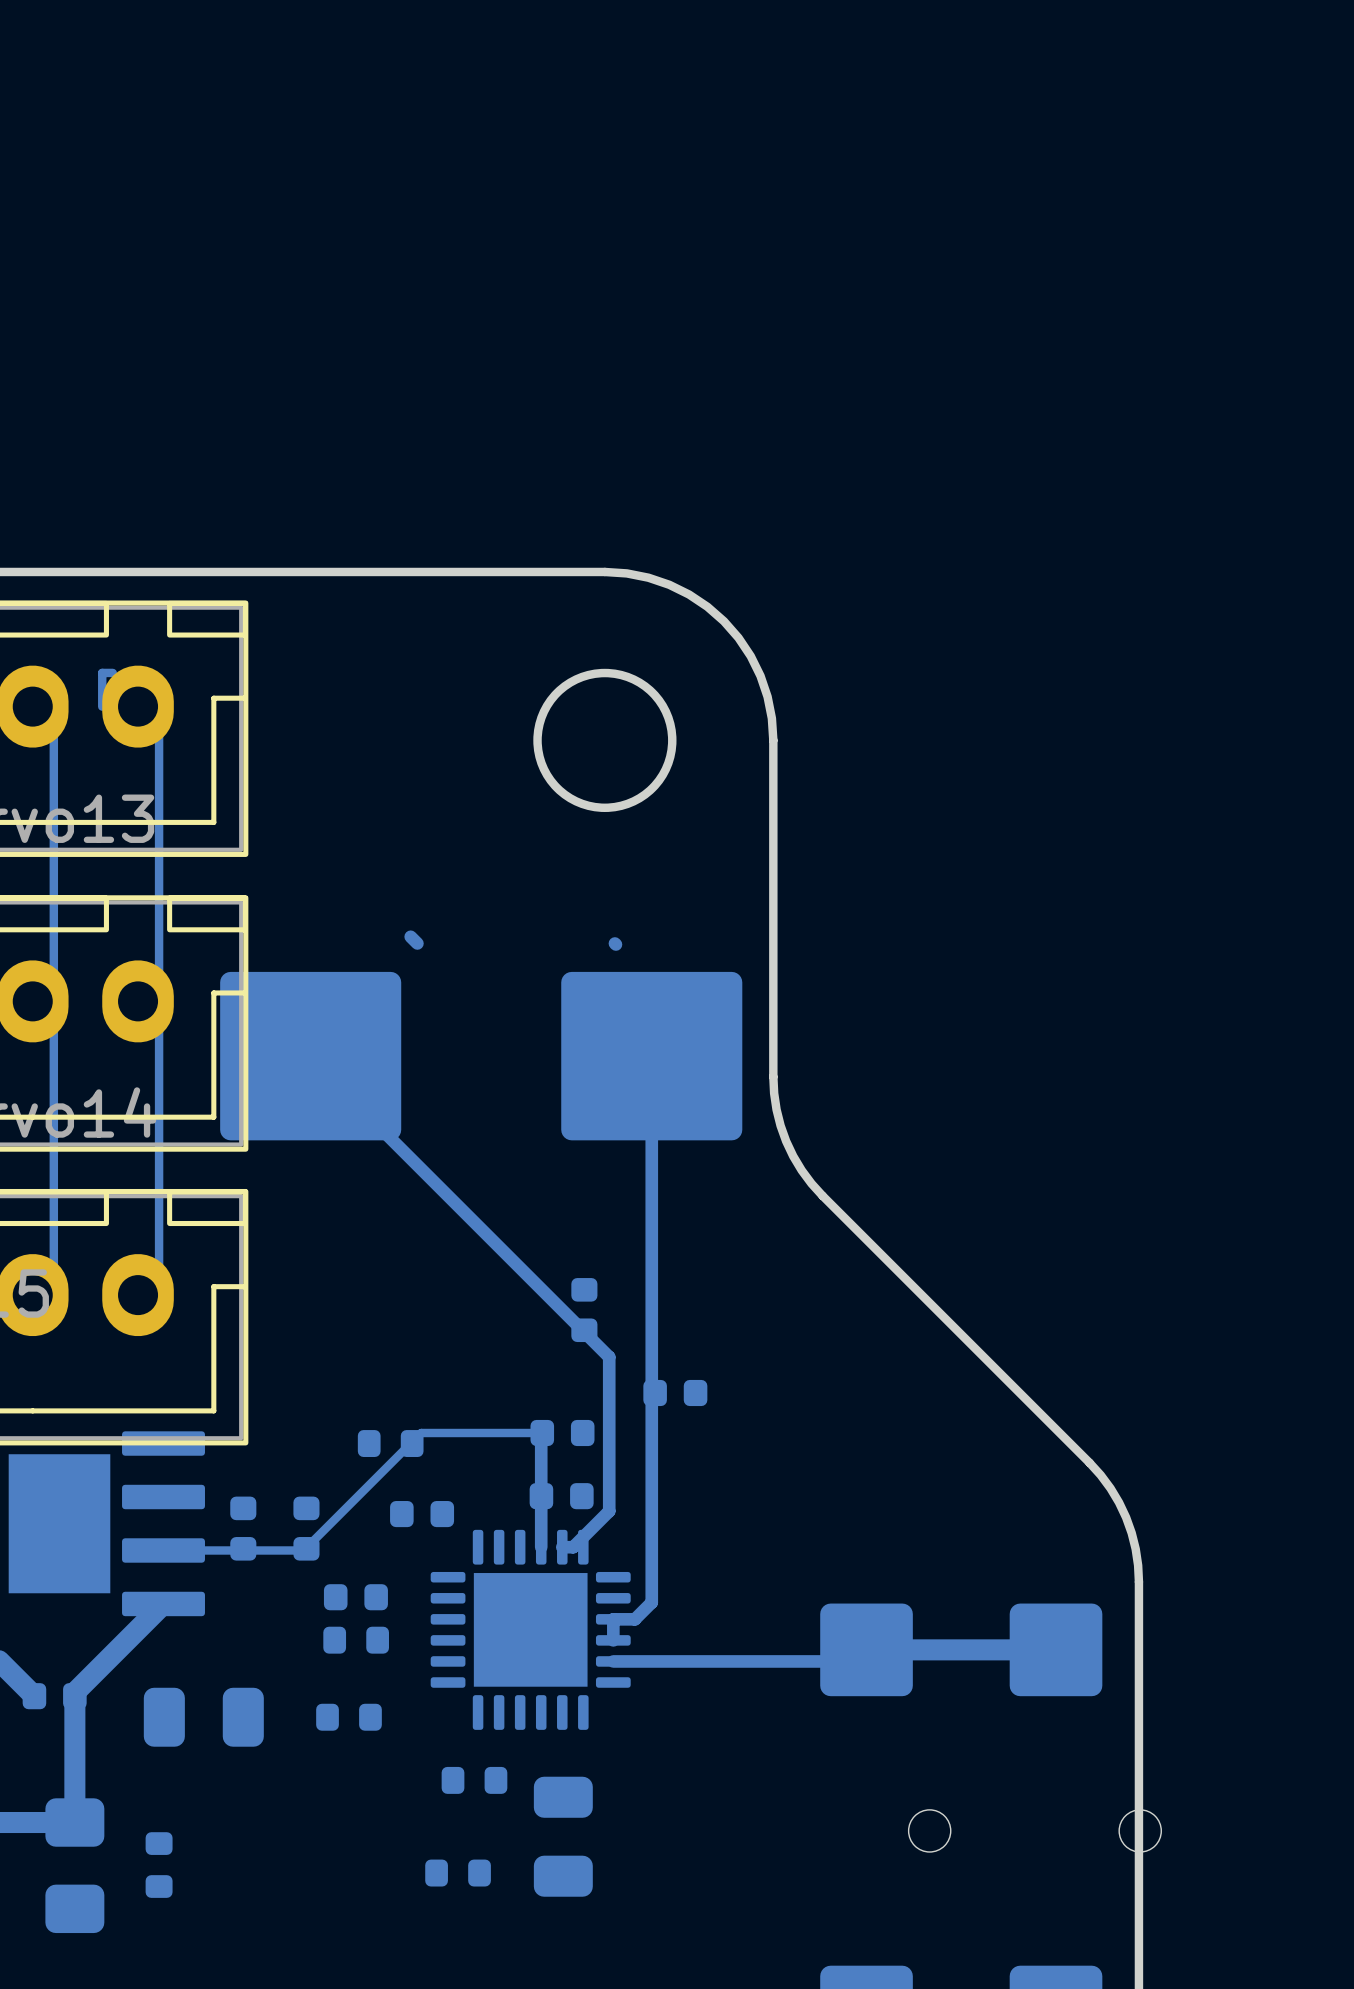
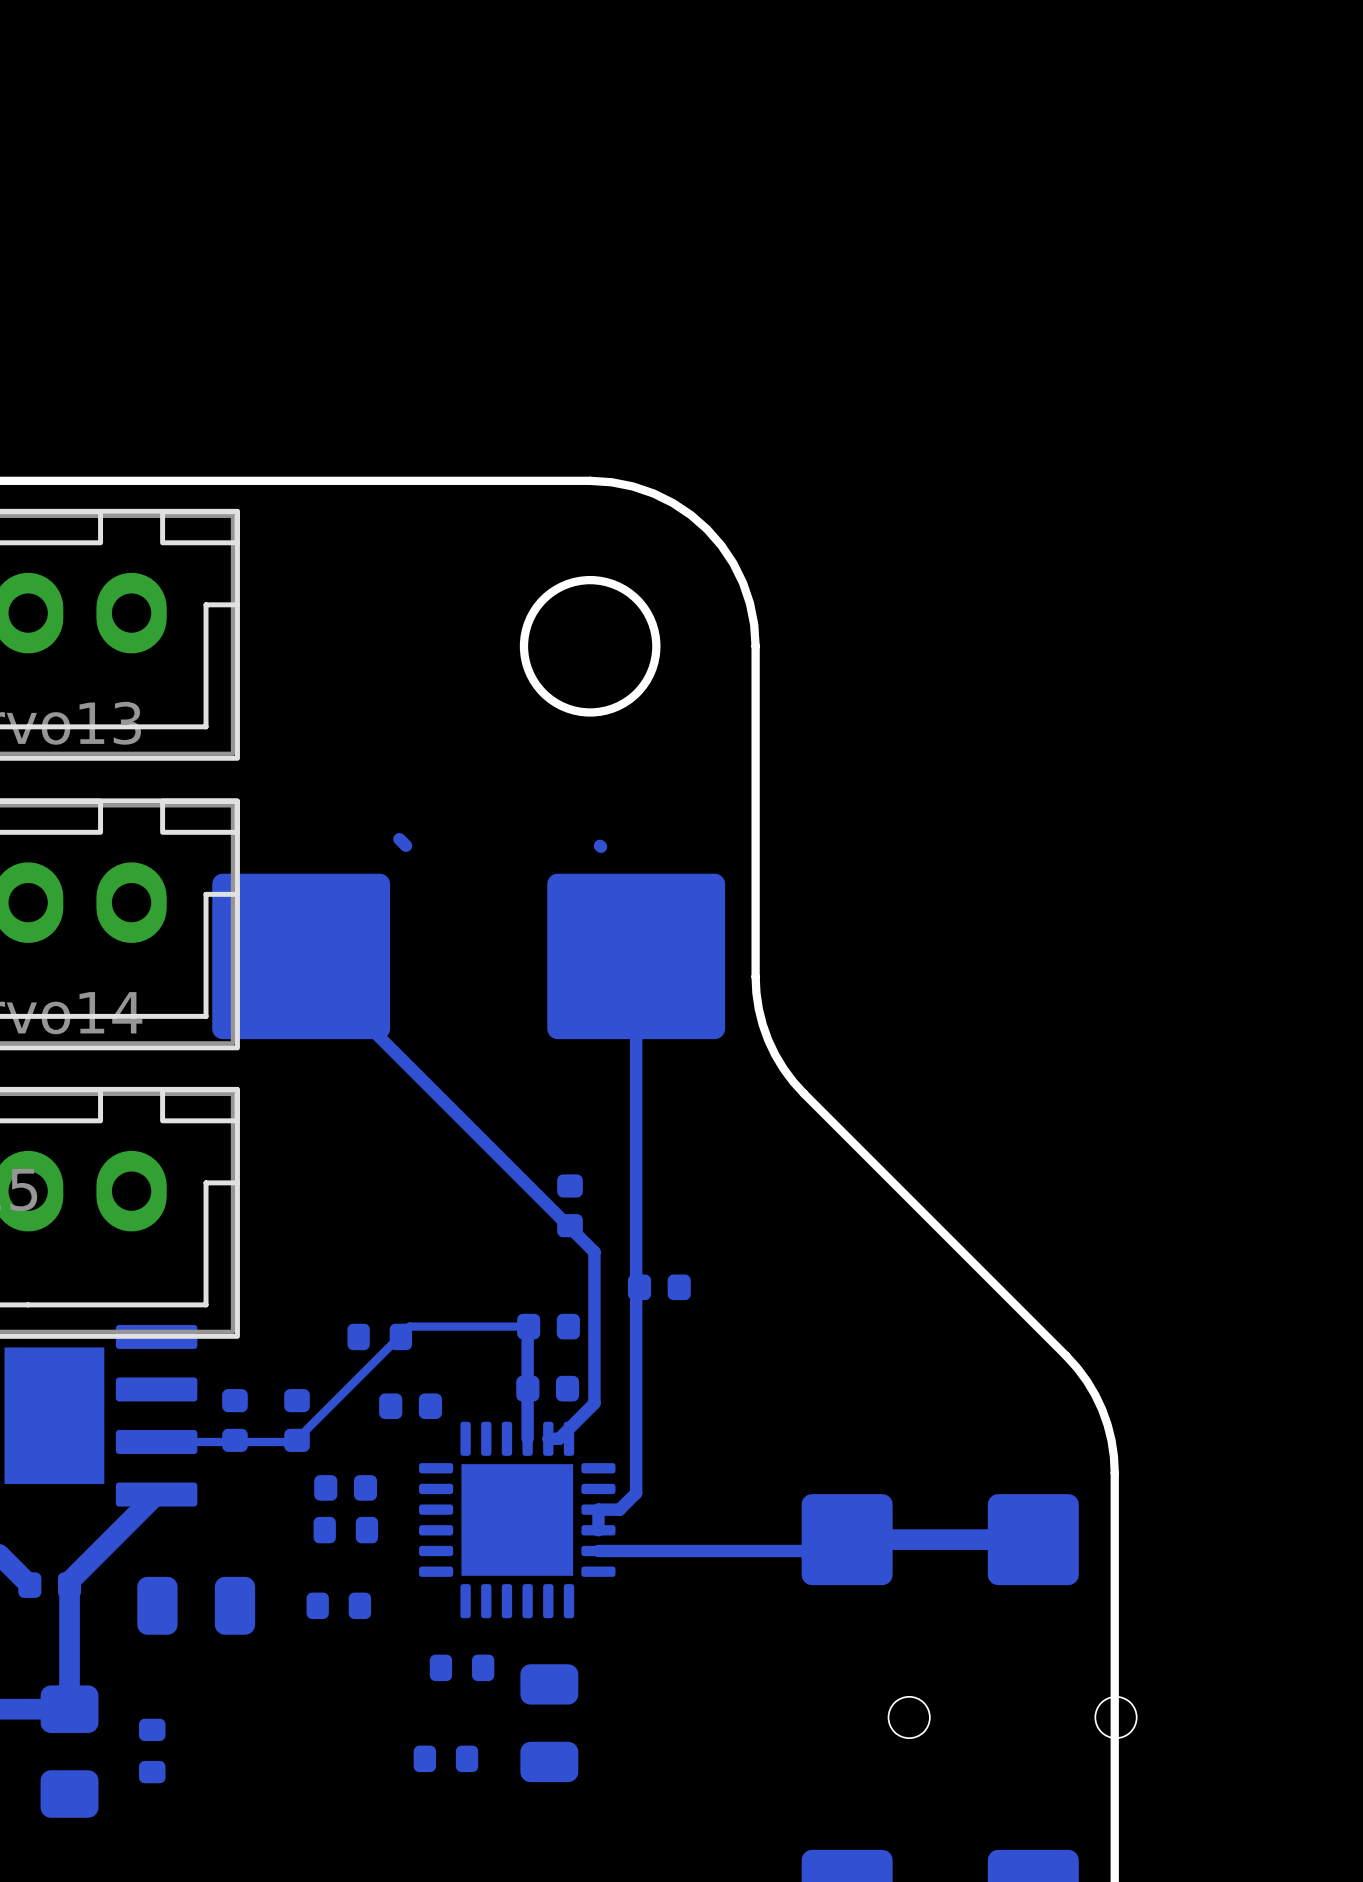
bottom track: (112, 672) (102, 672) (102, 706) -> none
bottom track: (53, 706) (53, 1295) -> none
bottom track: (159, 706) (159, 1295) -> none

